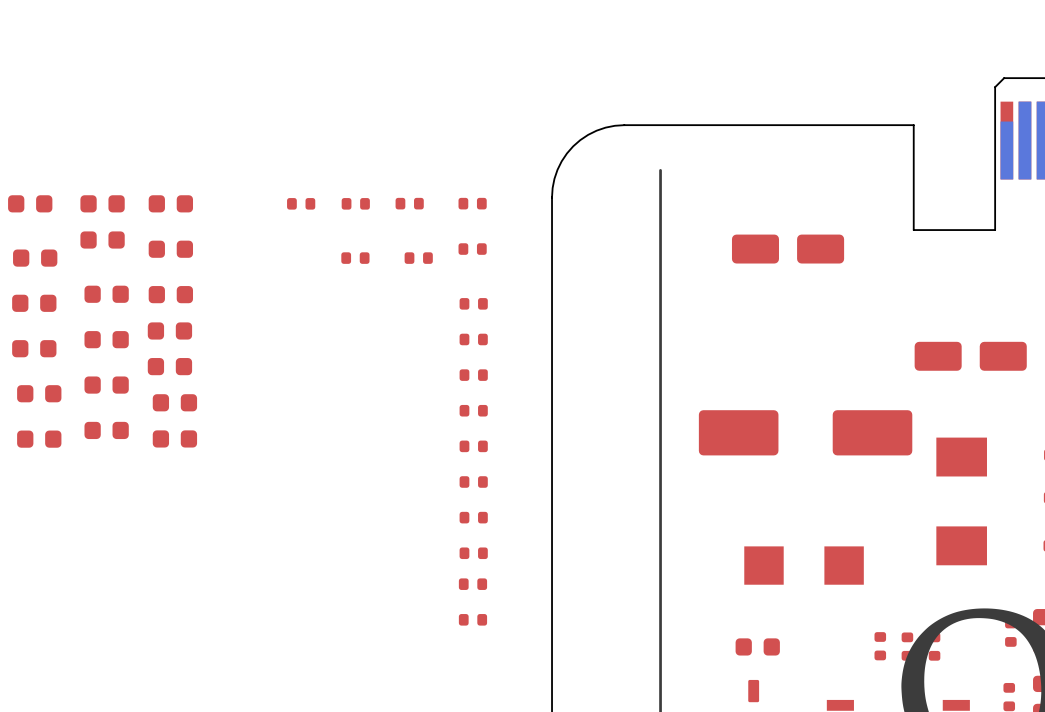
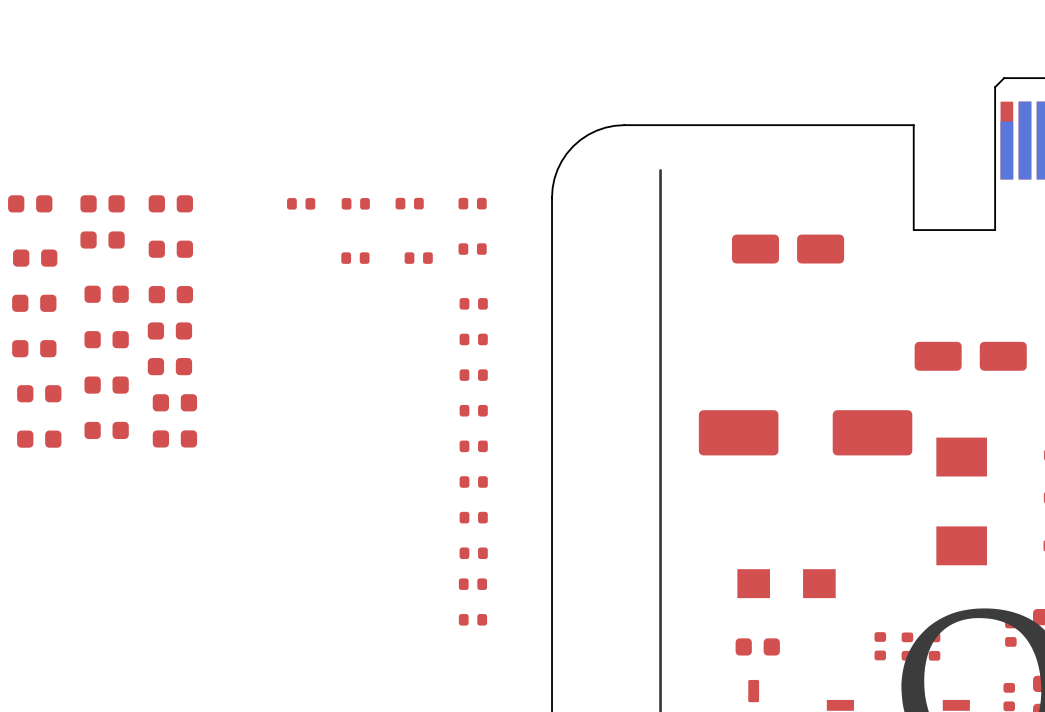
part: (804, 565) -> none
part: none -> (786, 583)

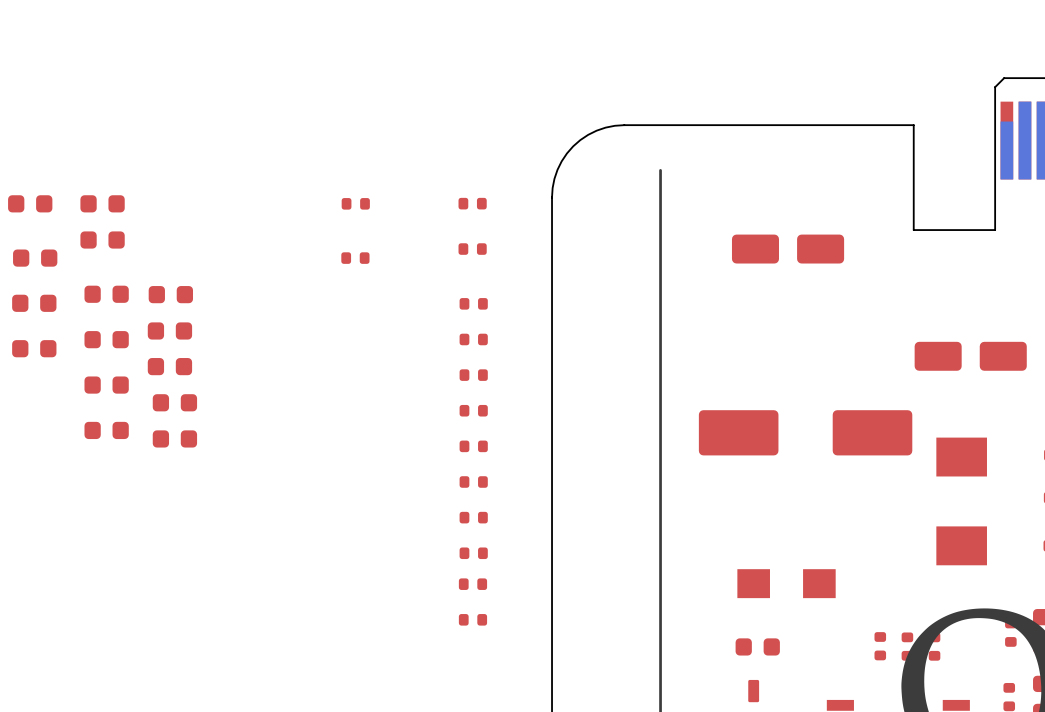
part: (170, 203) -> none
part: (301, 203) -> none
part: (409, 203) -> none
part: (170, 249) -> none
part: (418, 258) -> none
part: (39, 393) -> none
part: (39, 439) -> none

